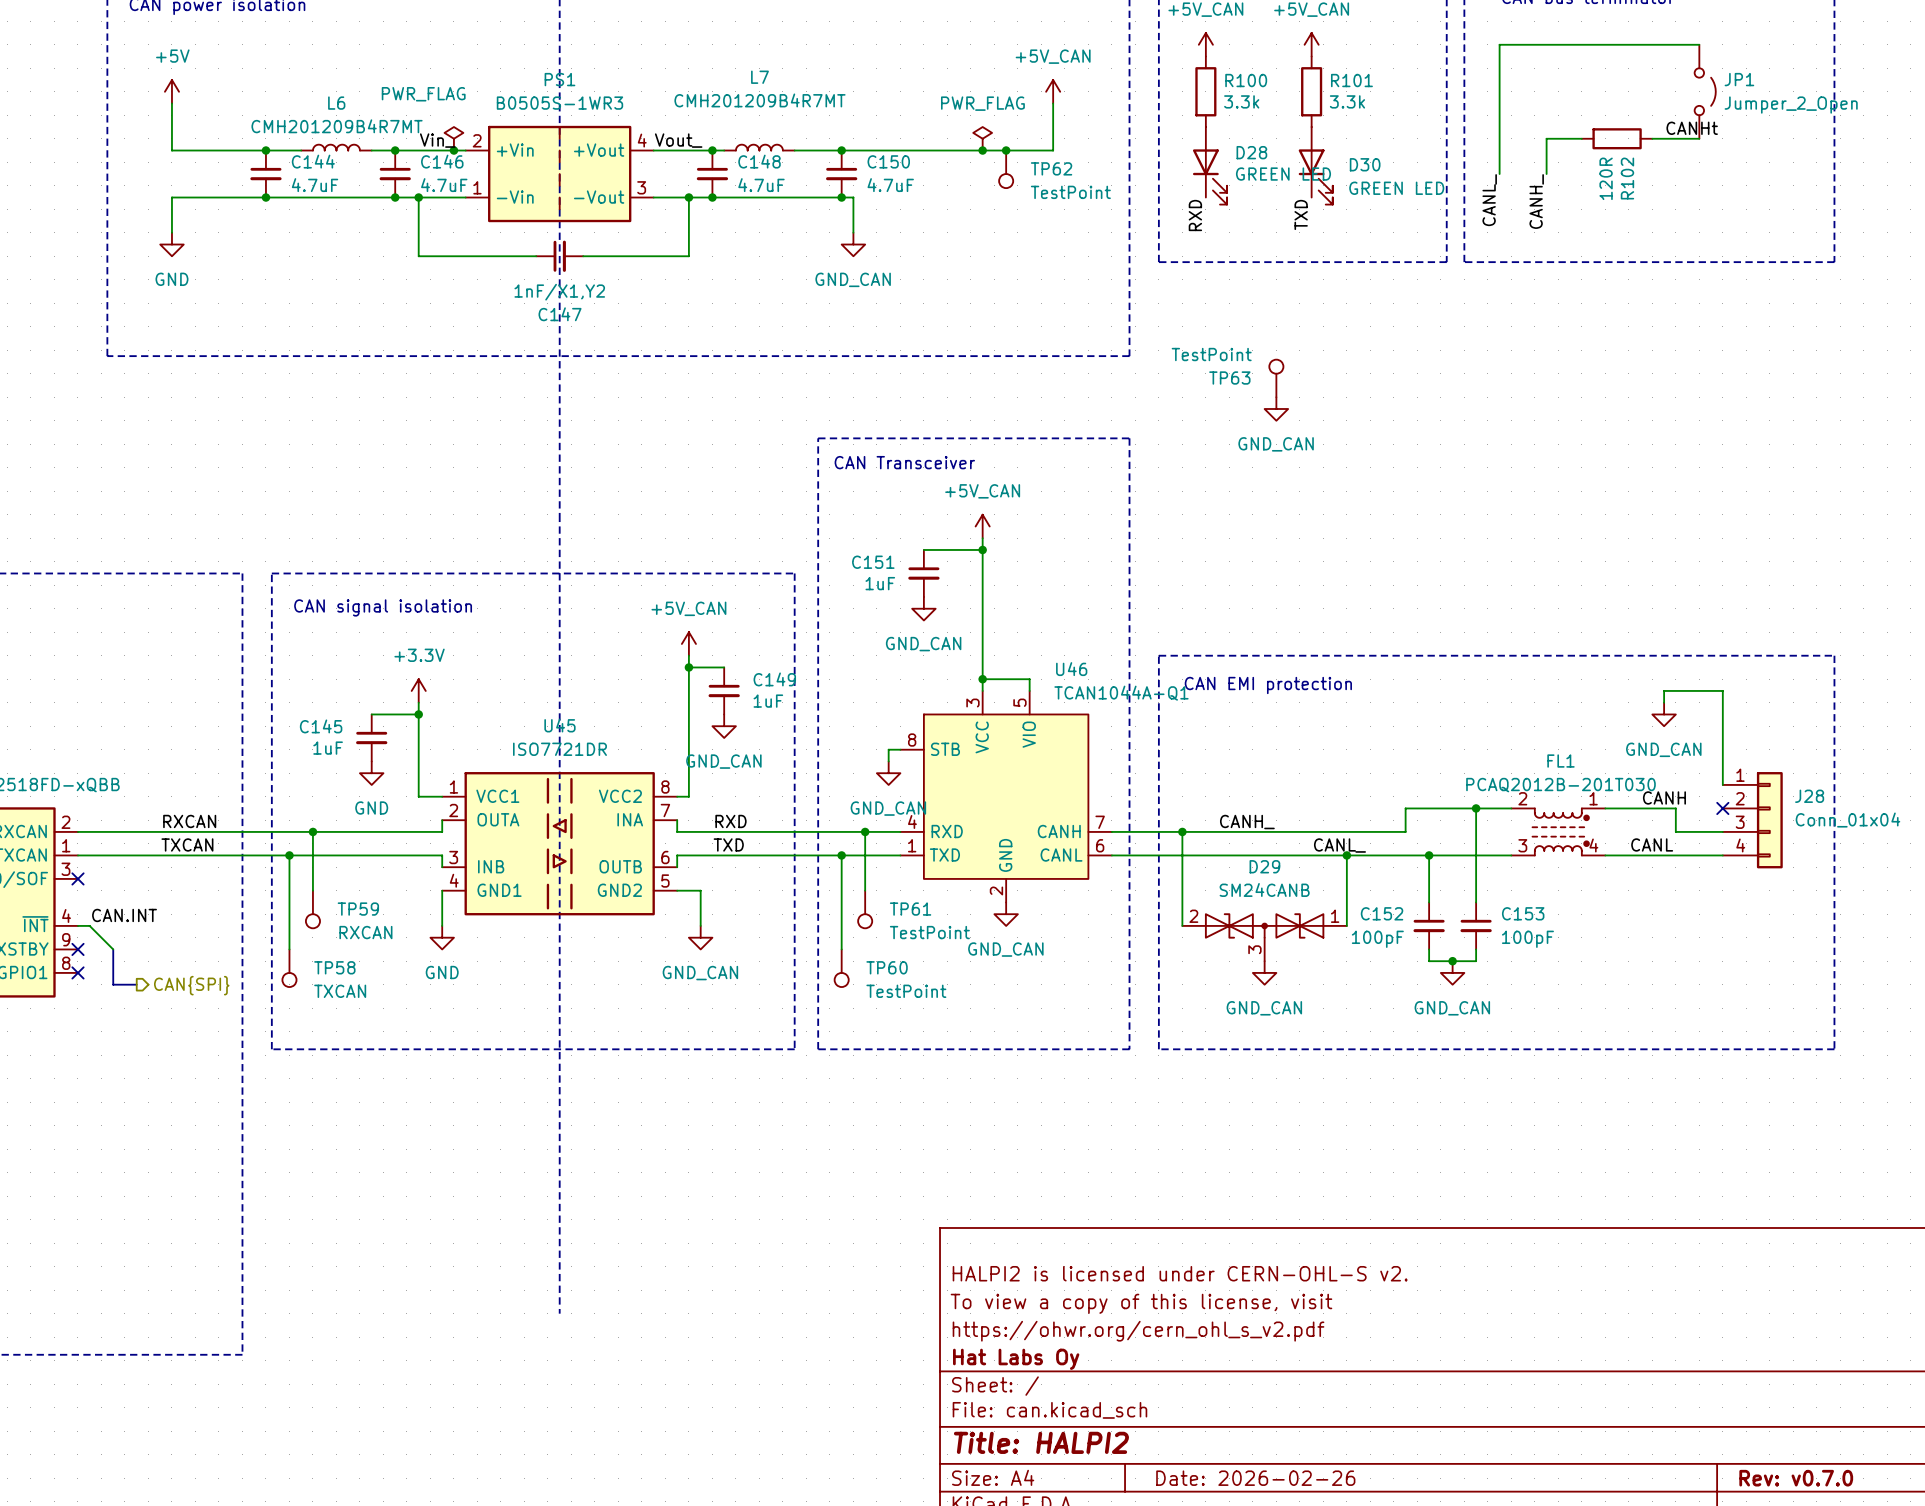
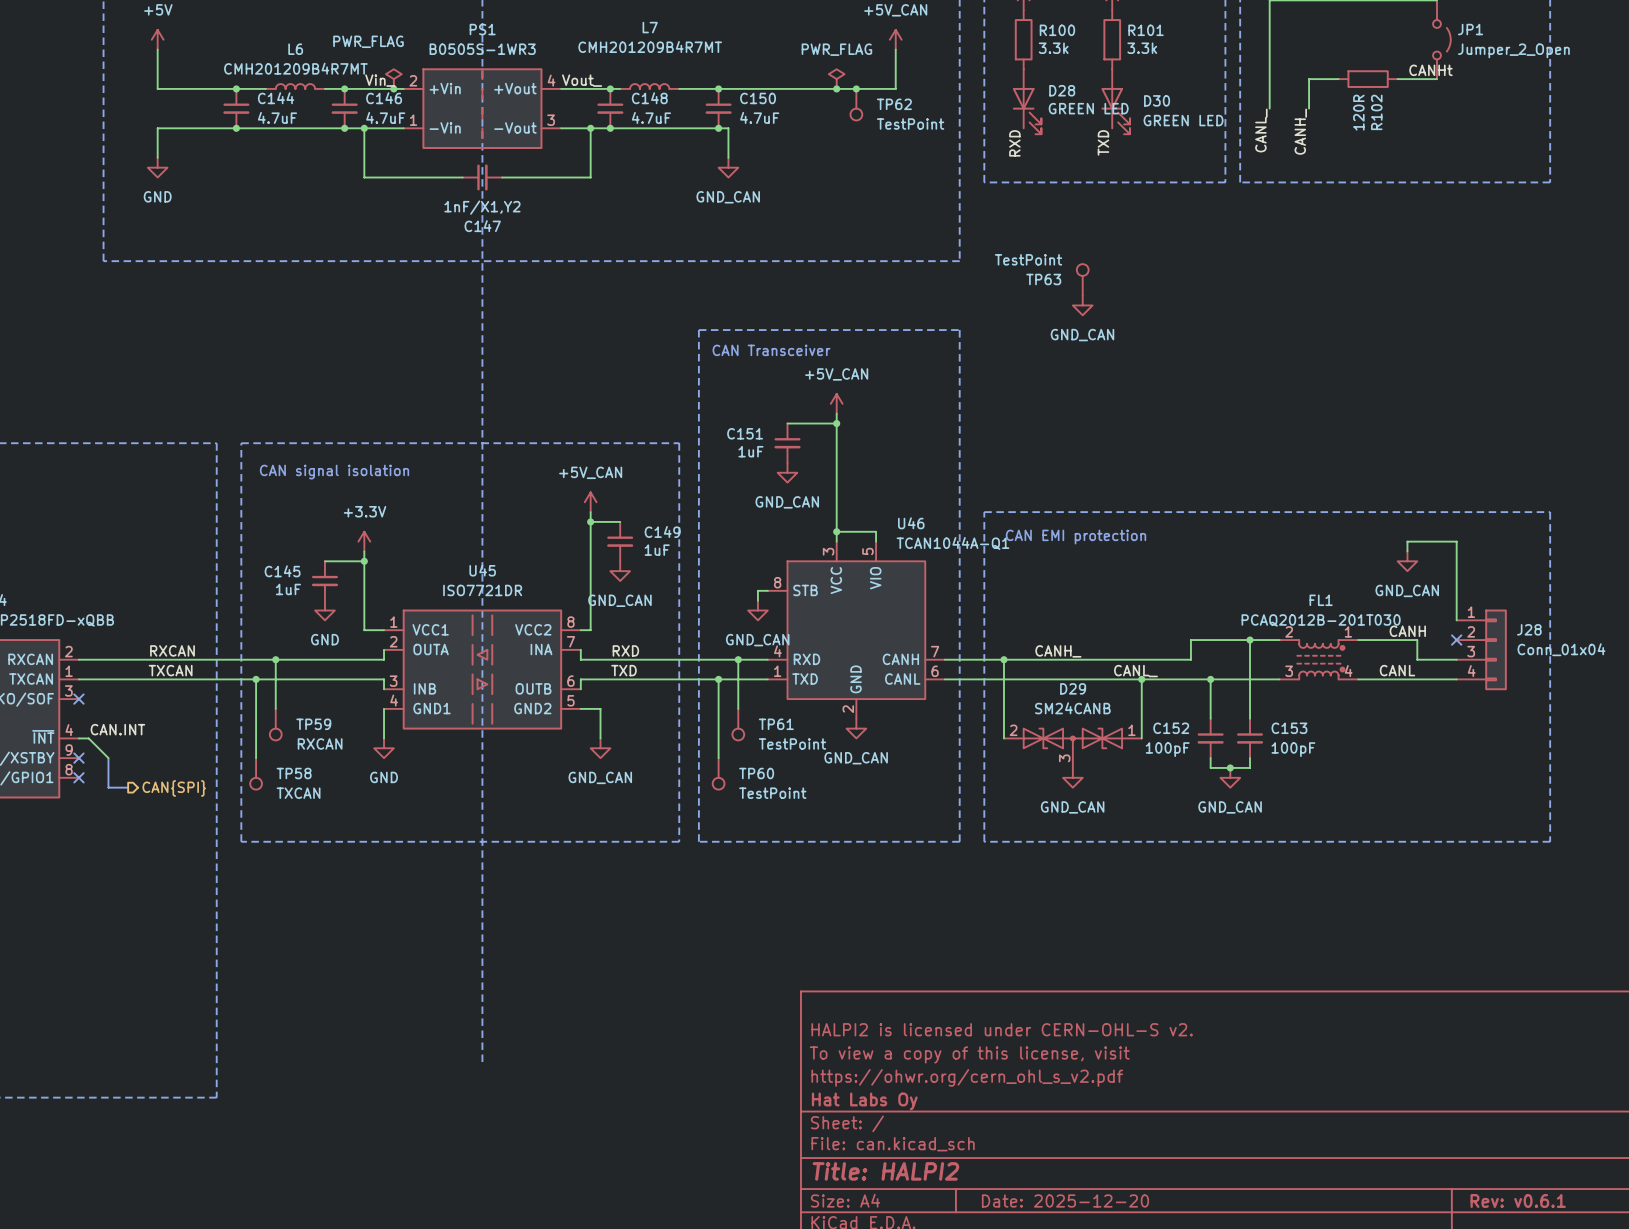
title block: Date: 2026-02-26 (1255, 1478) -> Date: 2025-12-20 (1065, 1200)
title block: Rev: v0.7.0 (1796, 1478) -> Rev: v0.6.1 (1518, 1200)

